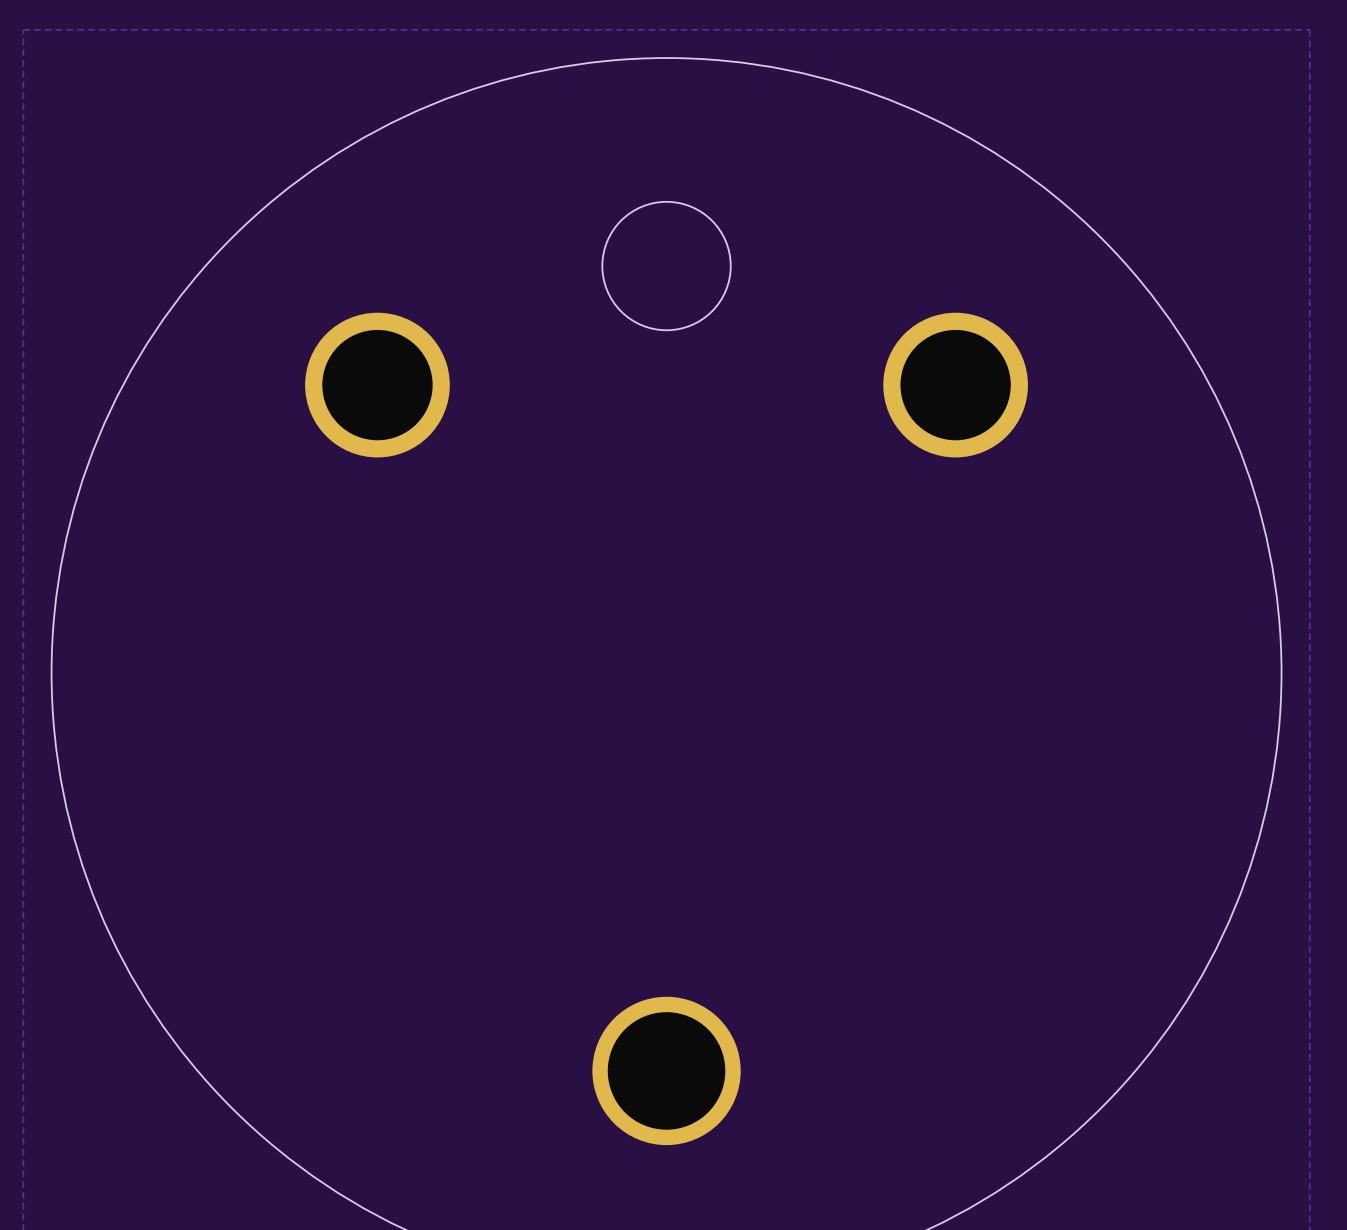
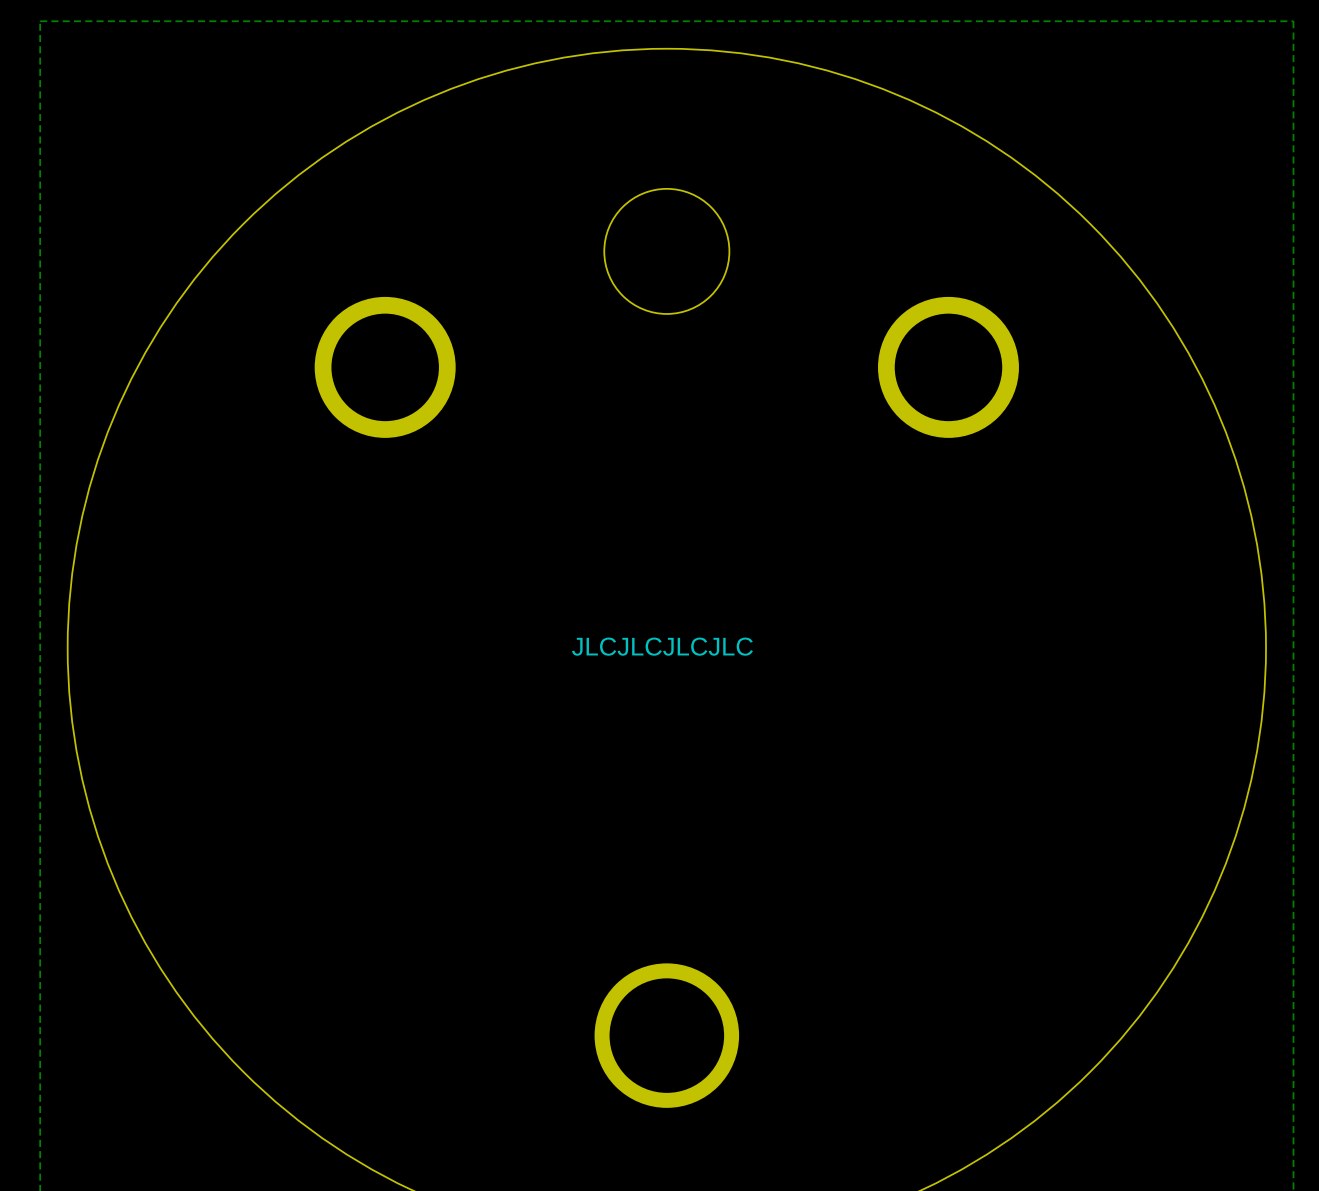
text: none -> JLCJLCJLCJLC (662, 646)

